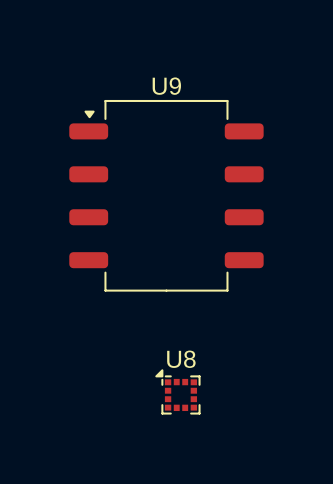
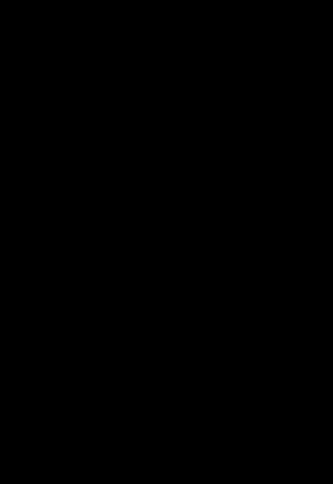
U9: (166, 195) -> none
U8: (177, 391) -> none

